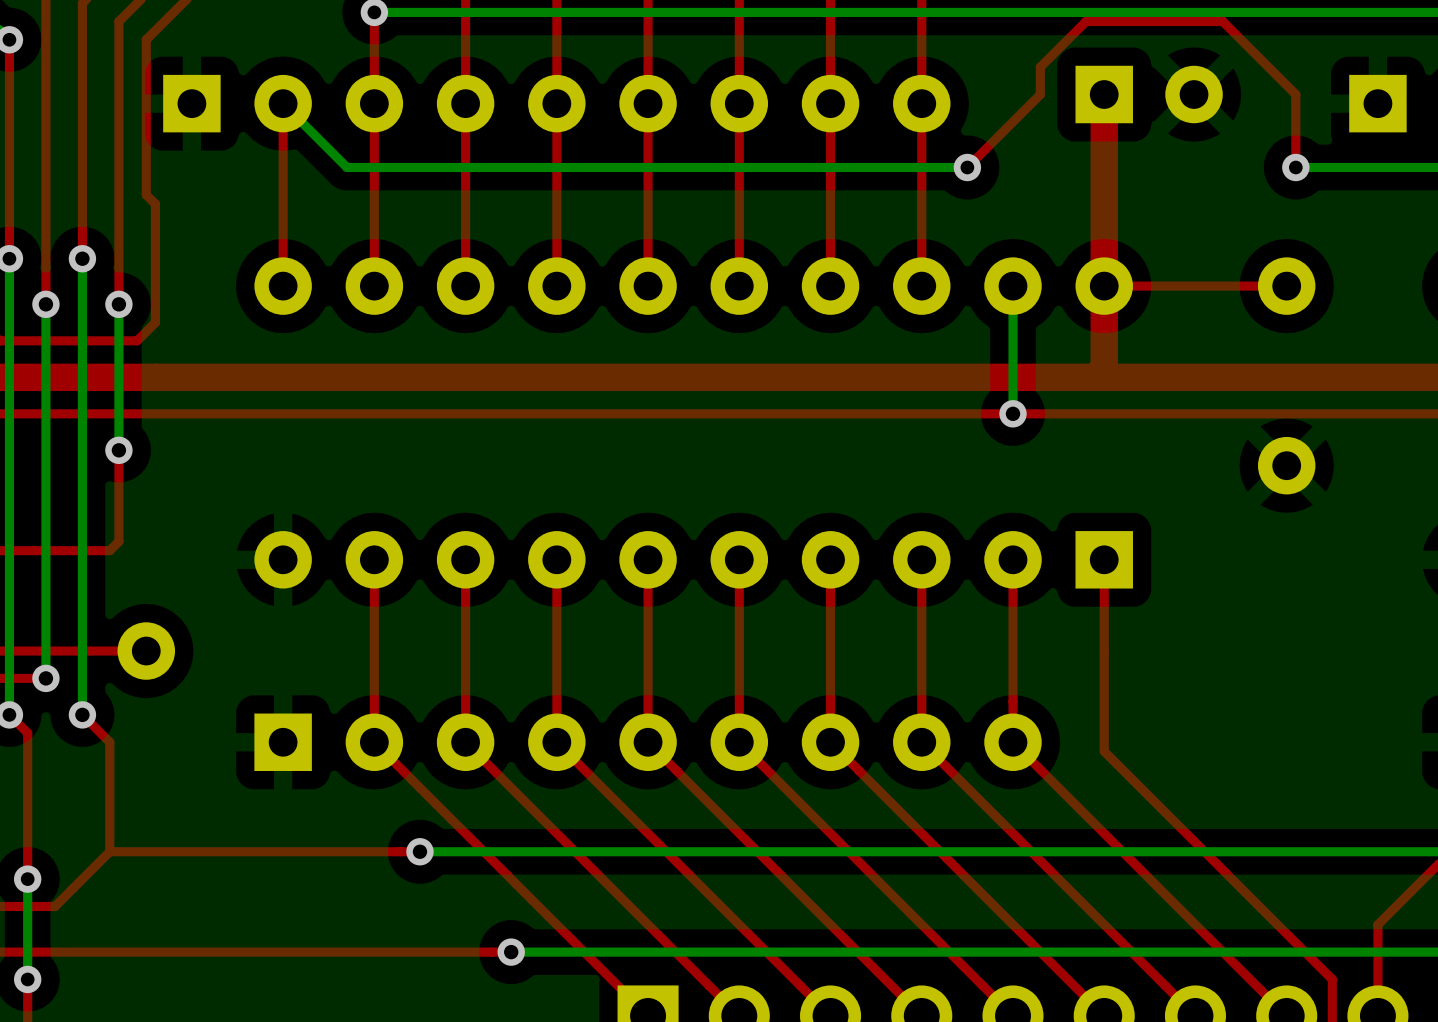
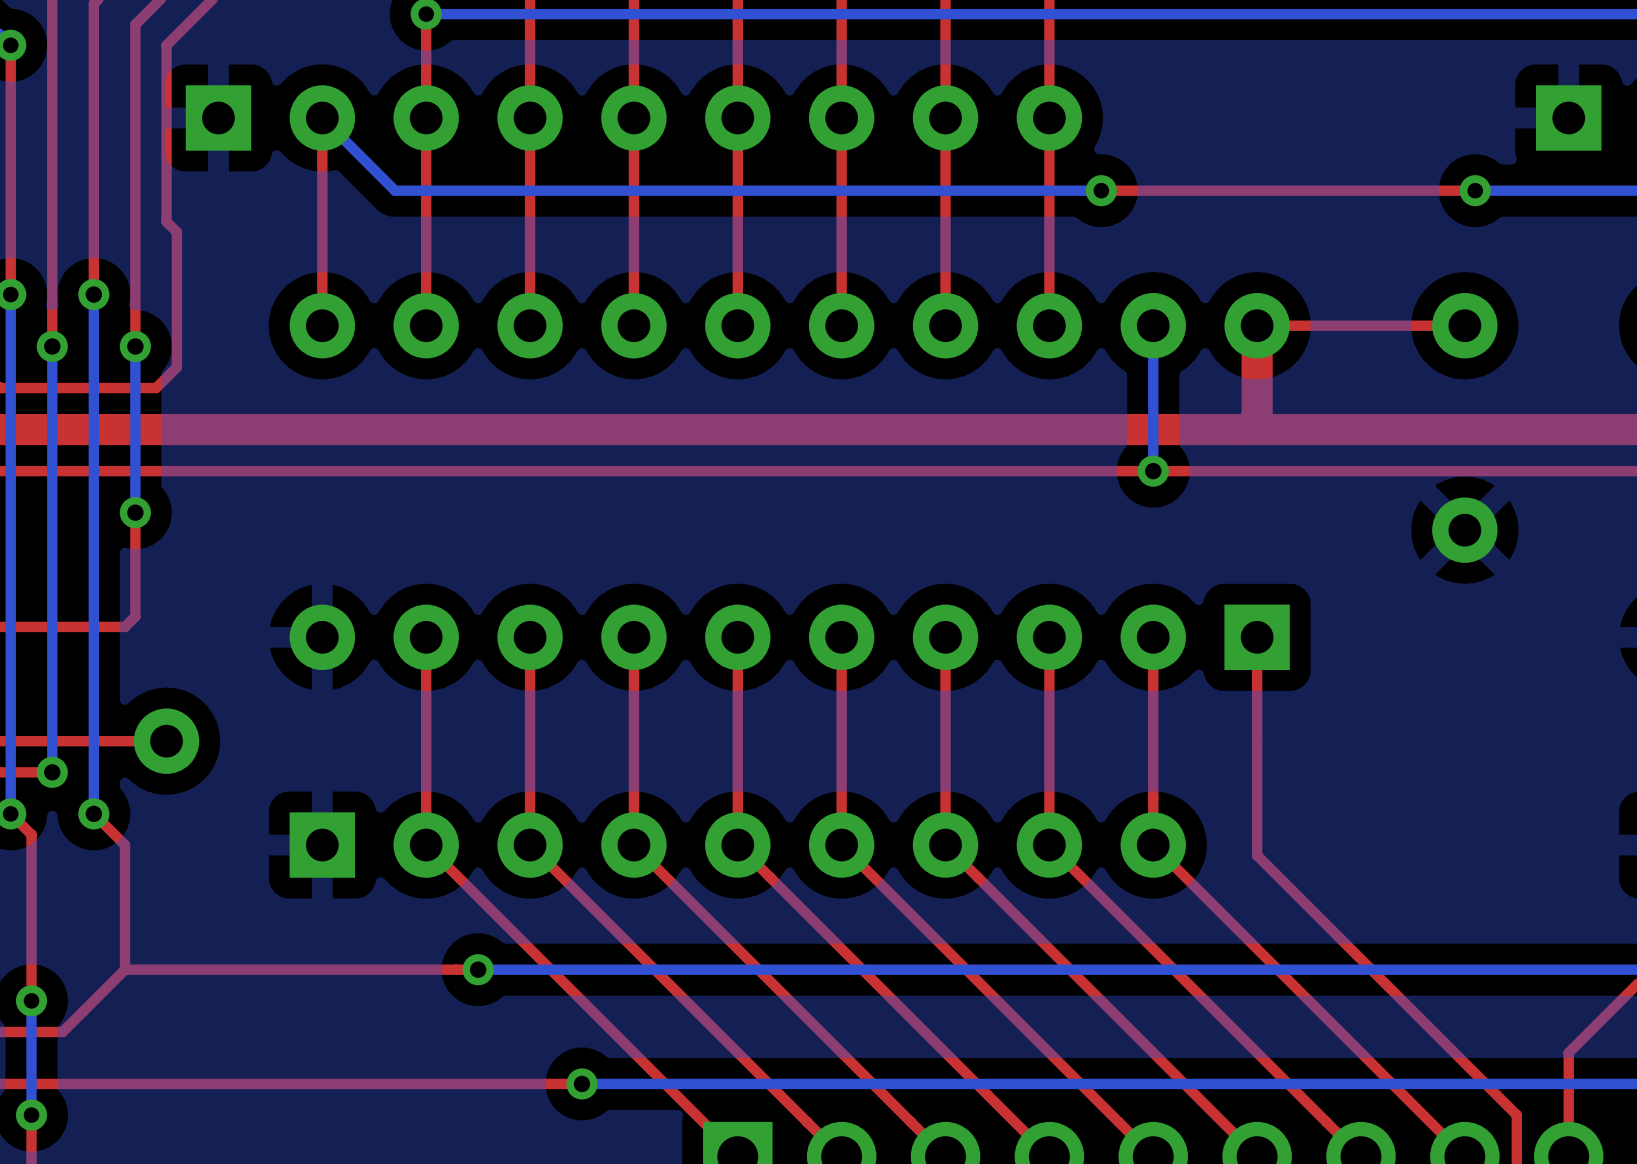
top track: (1104, 94) (1104, 286) -> none
part: (1149, 94) -> none
top track: (1295, 167) (1295, 94) (1222, 21) (1085, 21) (1040, 67) (1040, 94) (967, 167) -> (1475, 190) (1101, 190)

